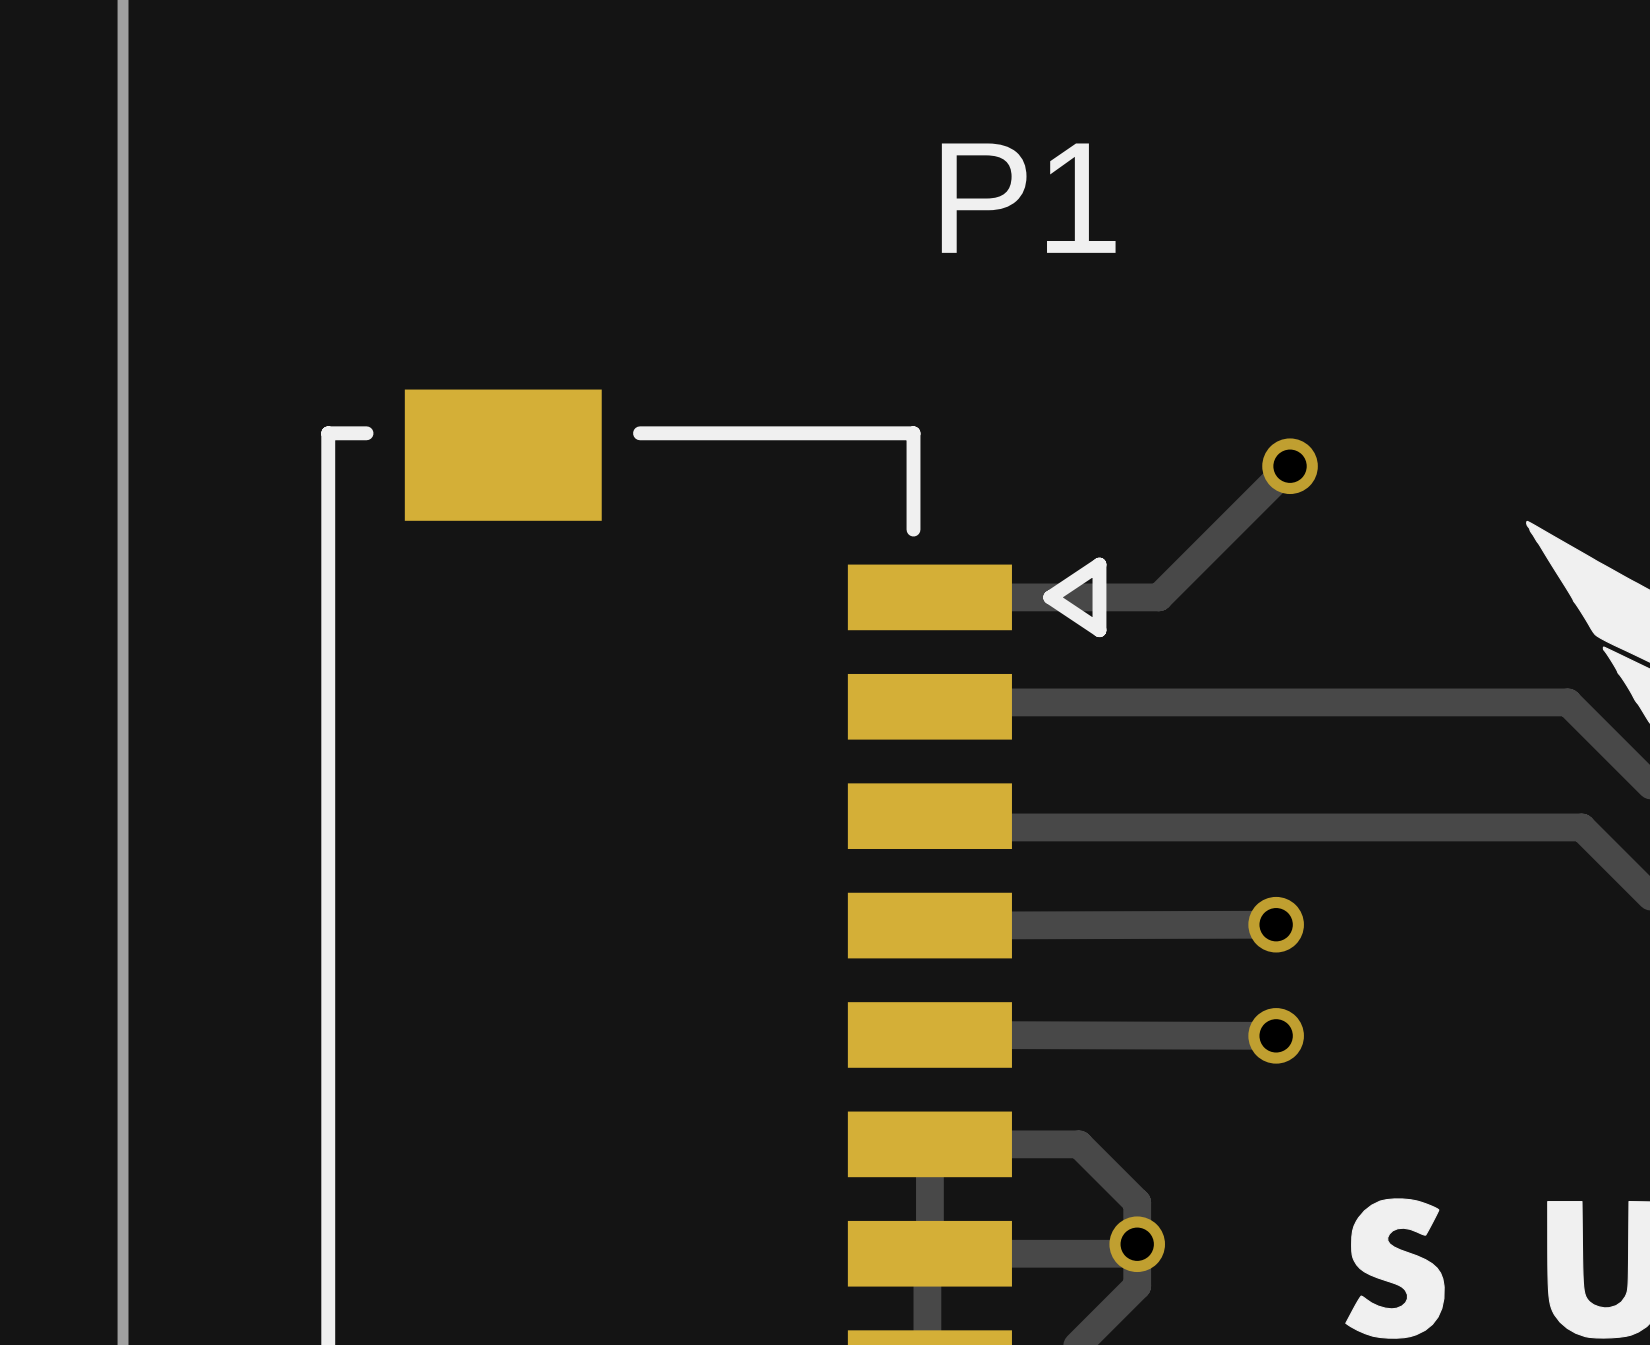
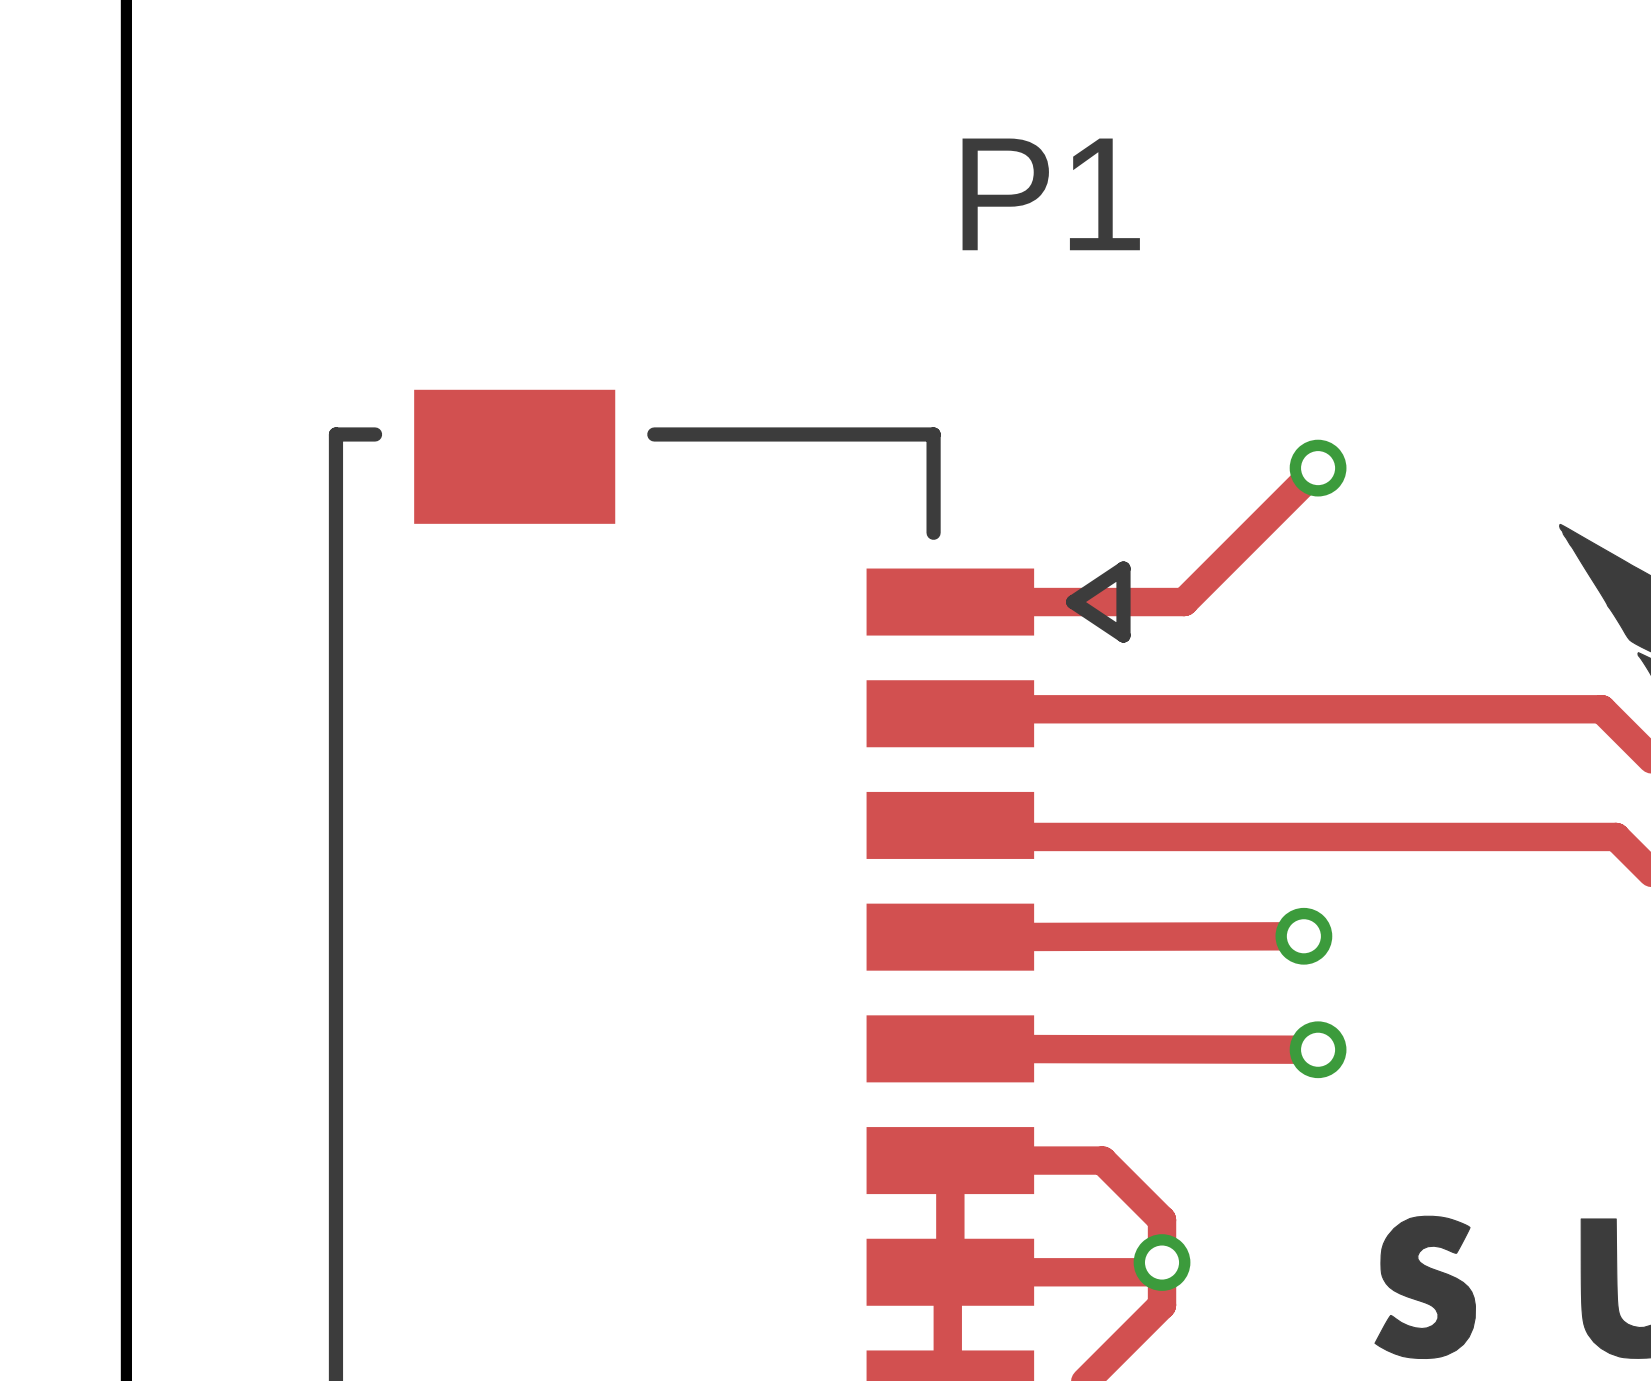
track: (929, 1034) (1276, 1035) -> (950, 1048) (1318, 1049)
via position: (1276, 1035) -> (1318, 1049)

